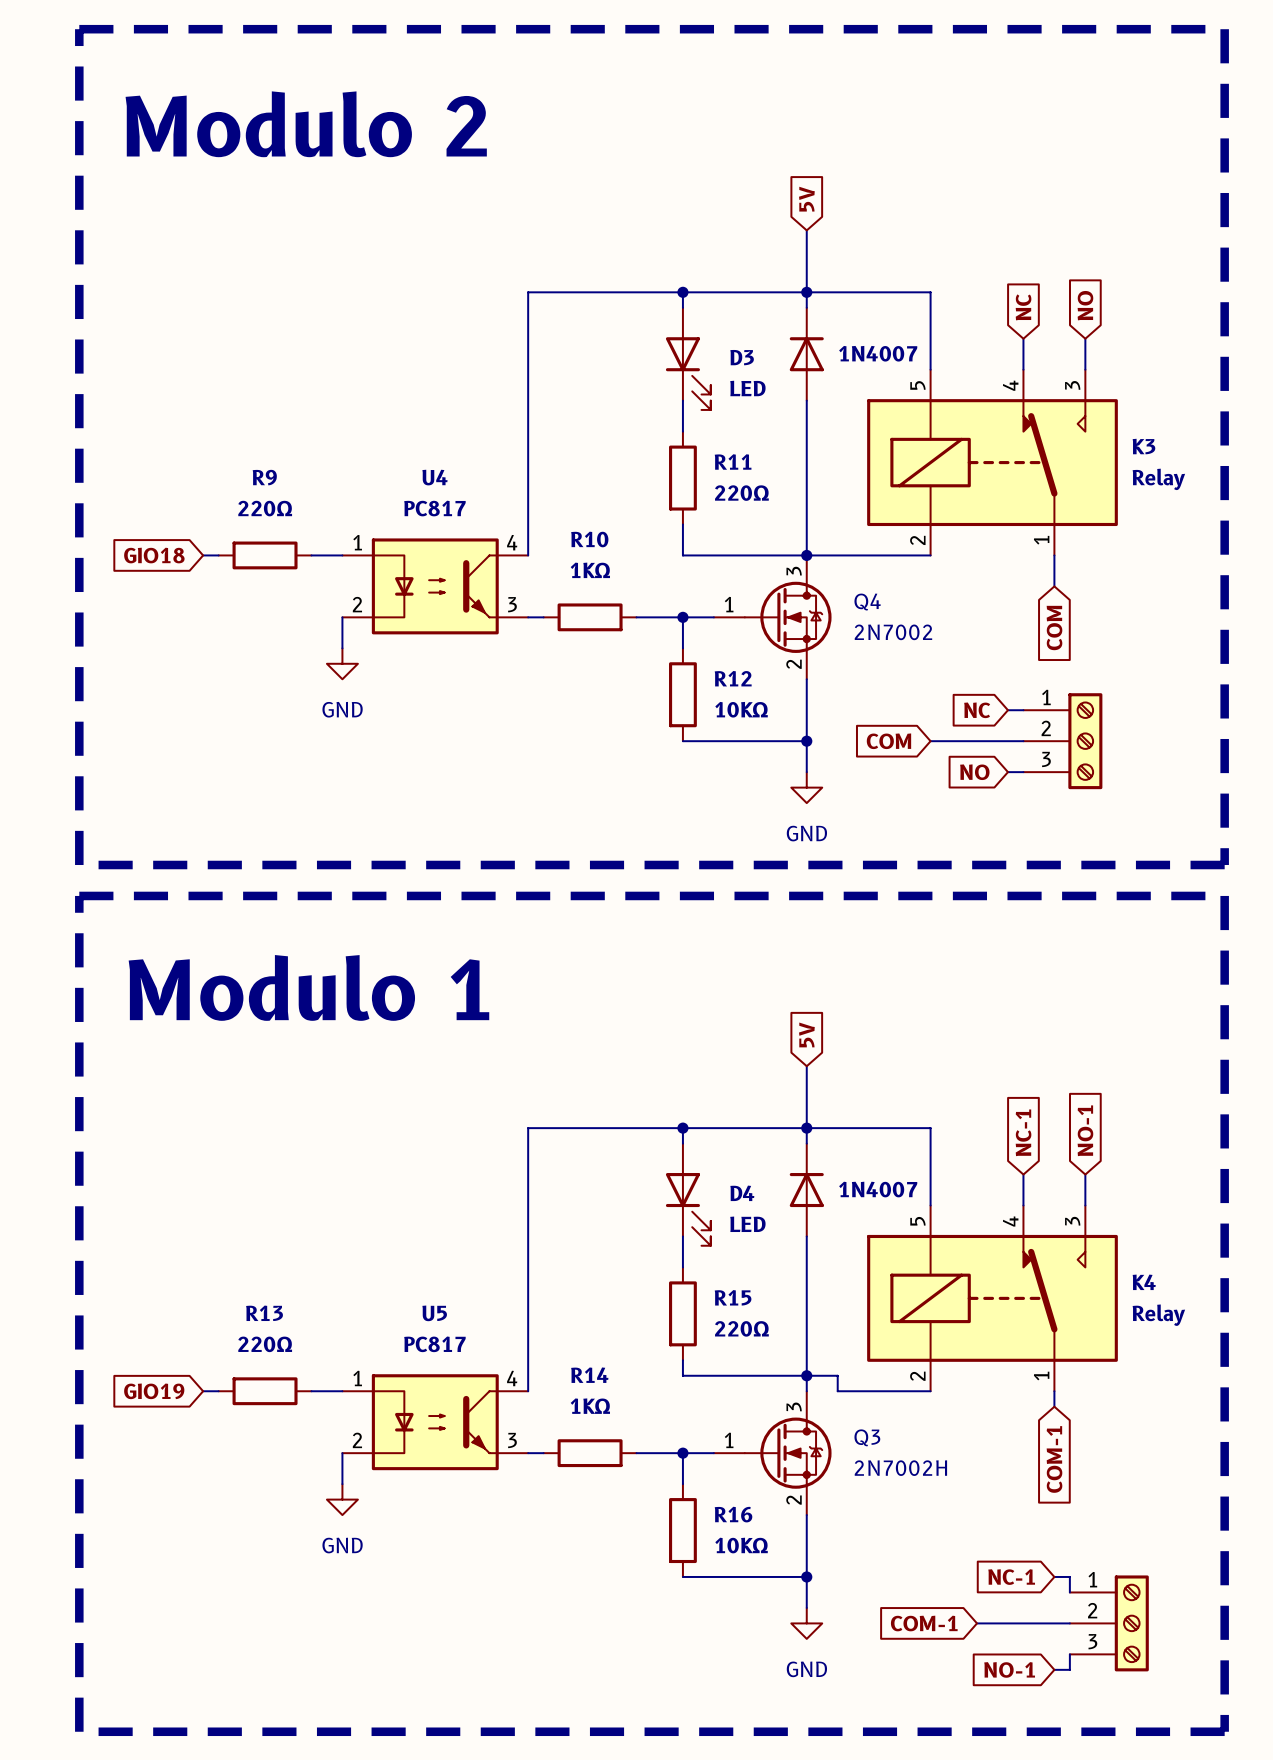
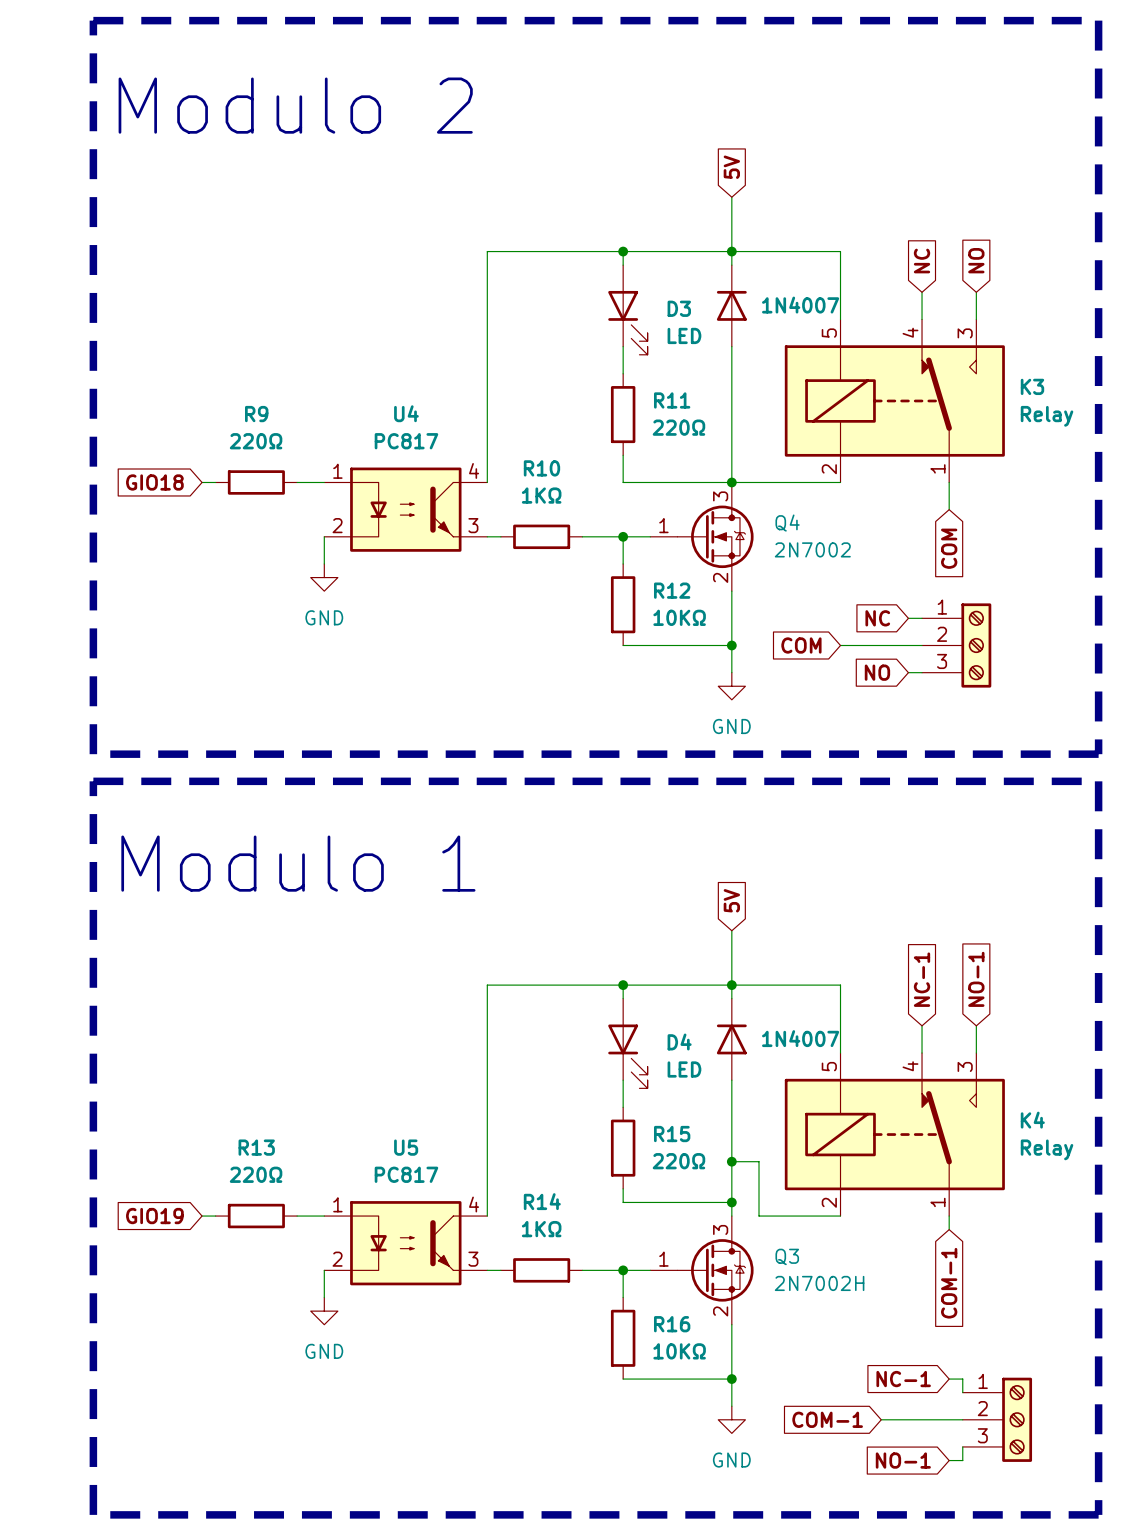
junction: none -> (731, 1161)
wire: (806, 1375) (837, 1375) -> (731, 1161) (759, 1161) (759, 1202)

